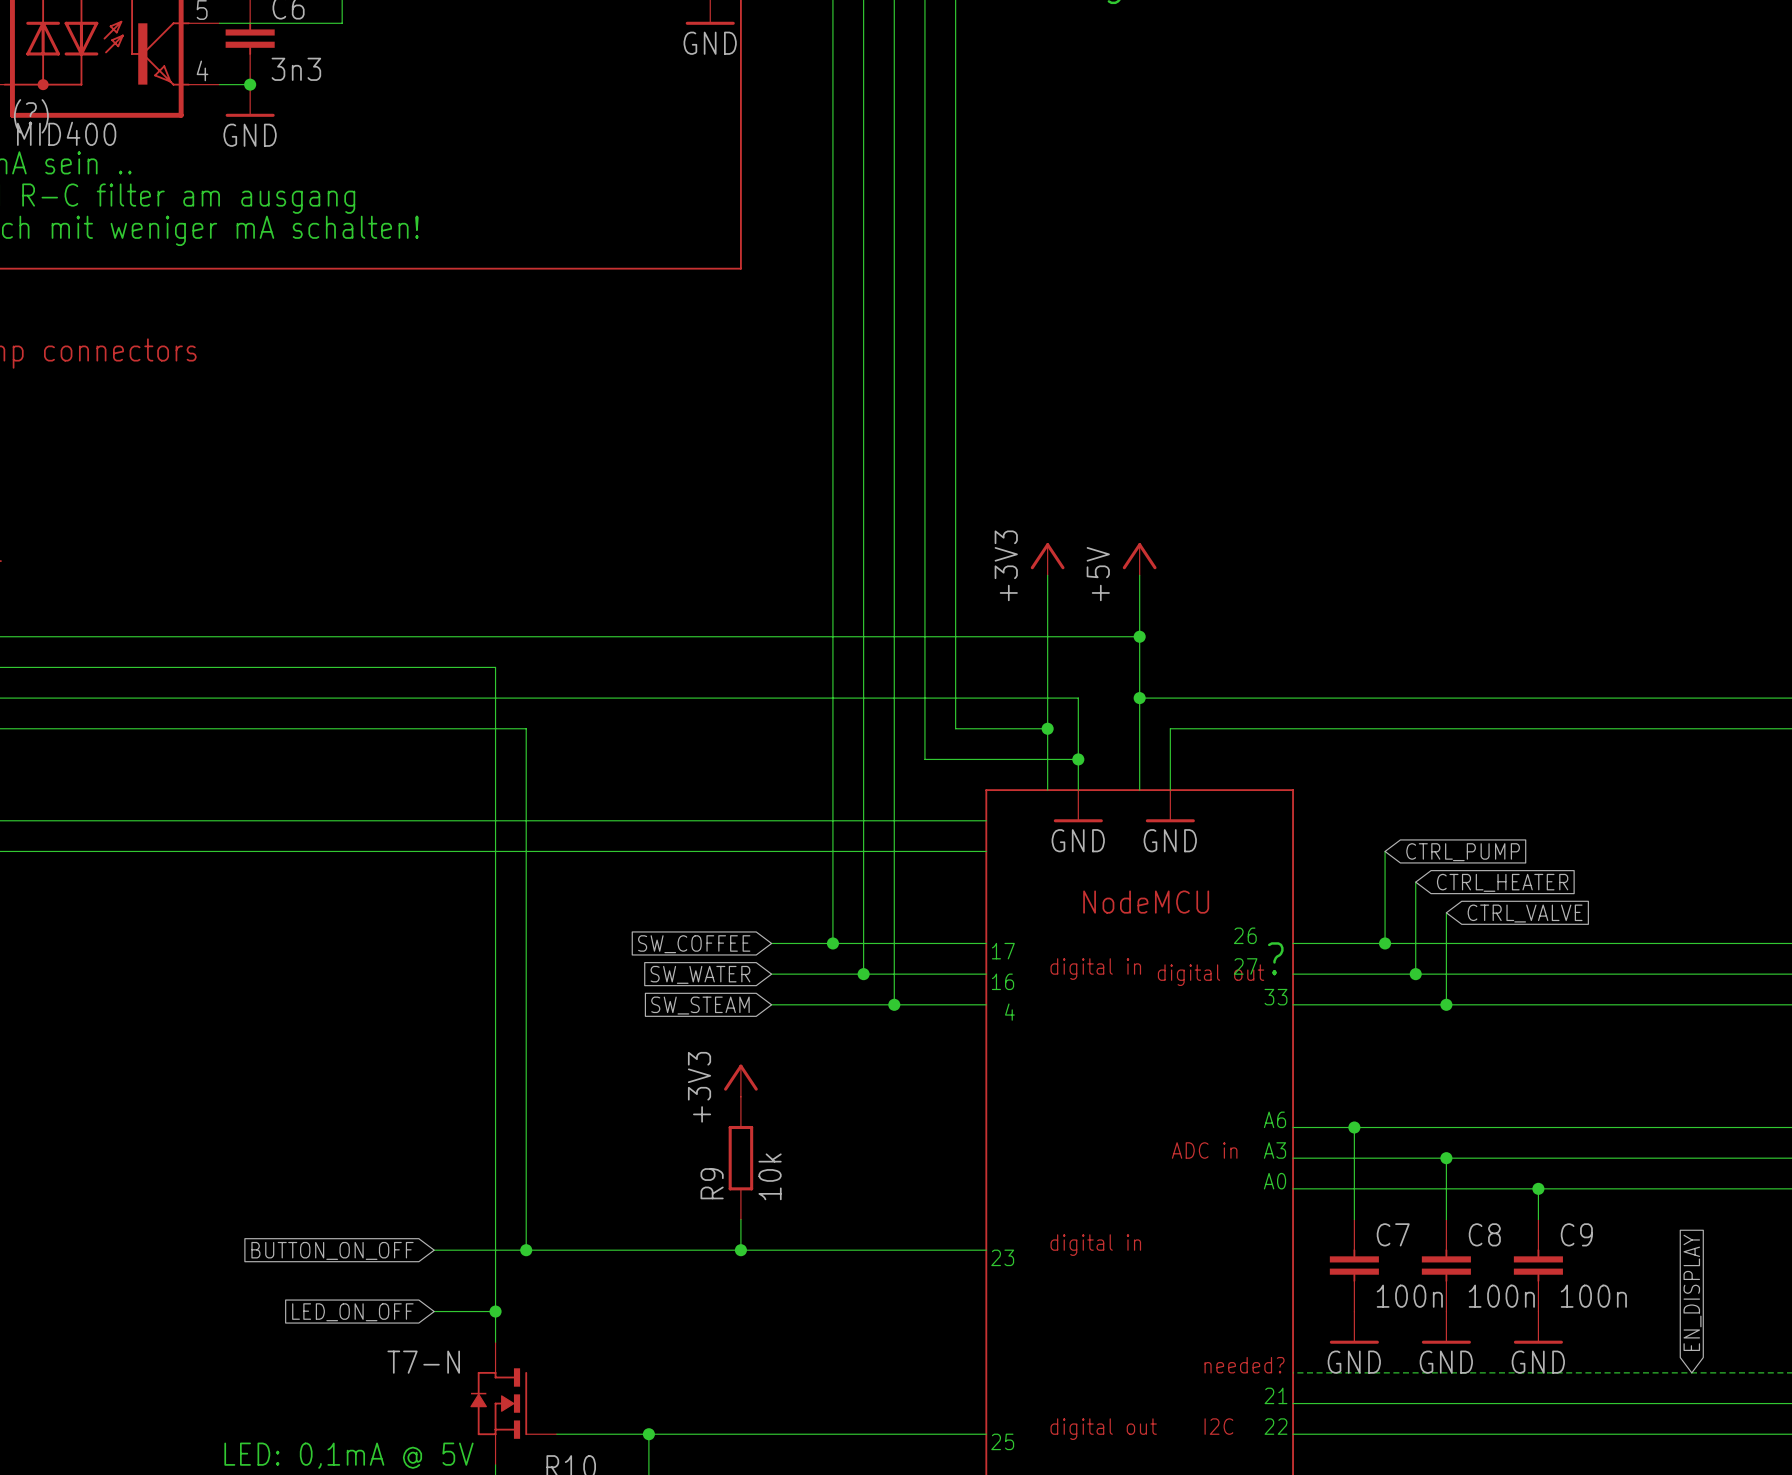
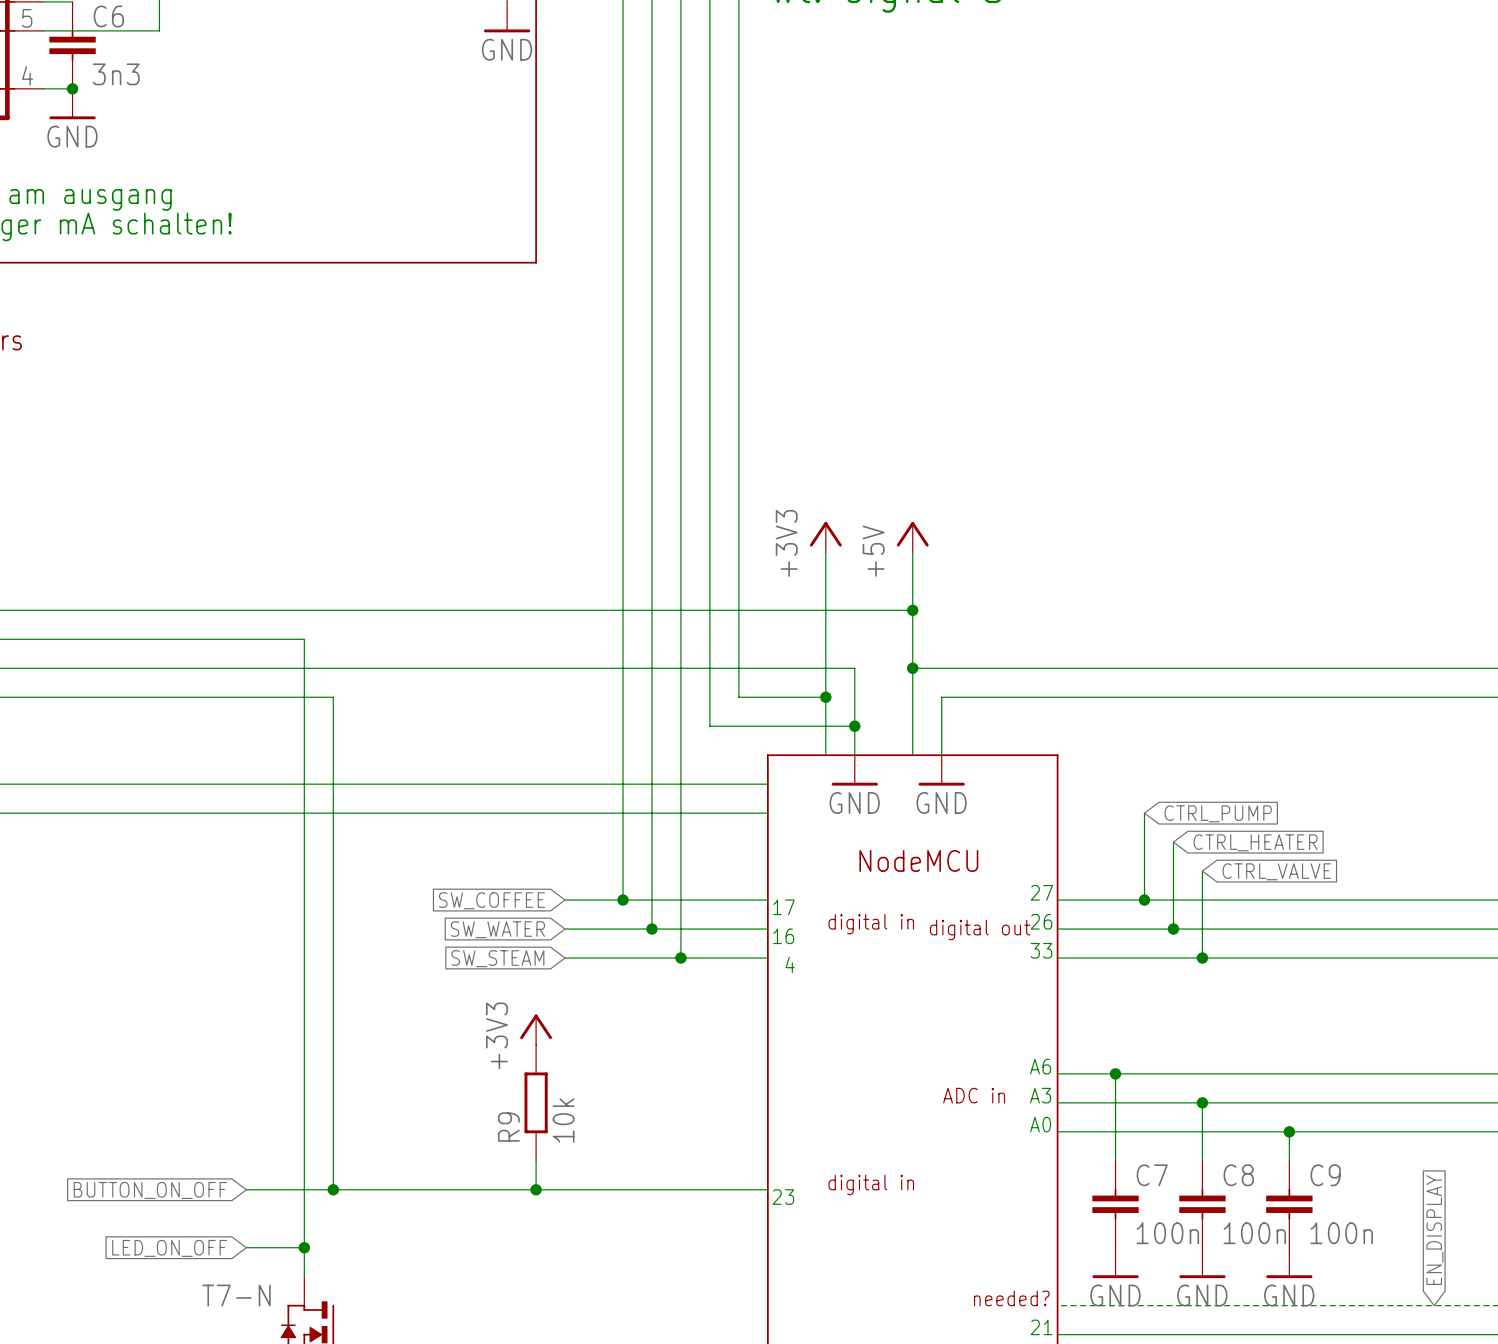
text: 26 (1245, 935) -> none
text: ? (1275, 958) -> 26 (1041, 921)
text position: 27 (1245, 966) -> 27 (1041, 892)

